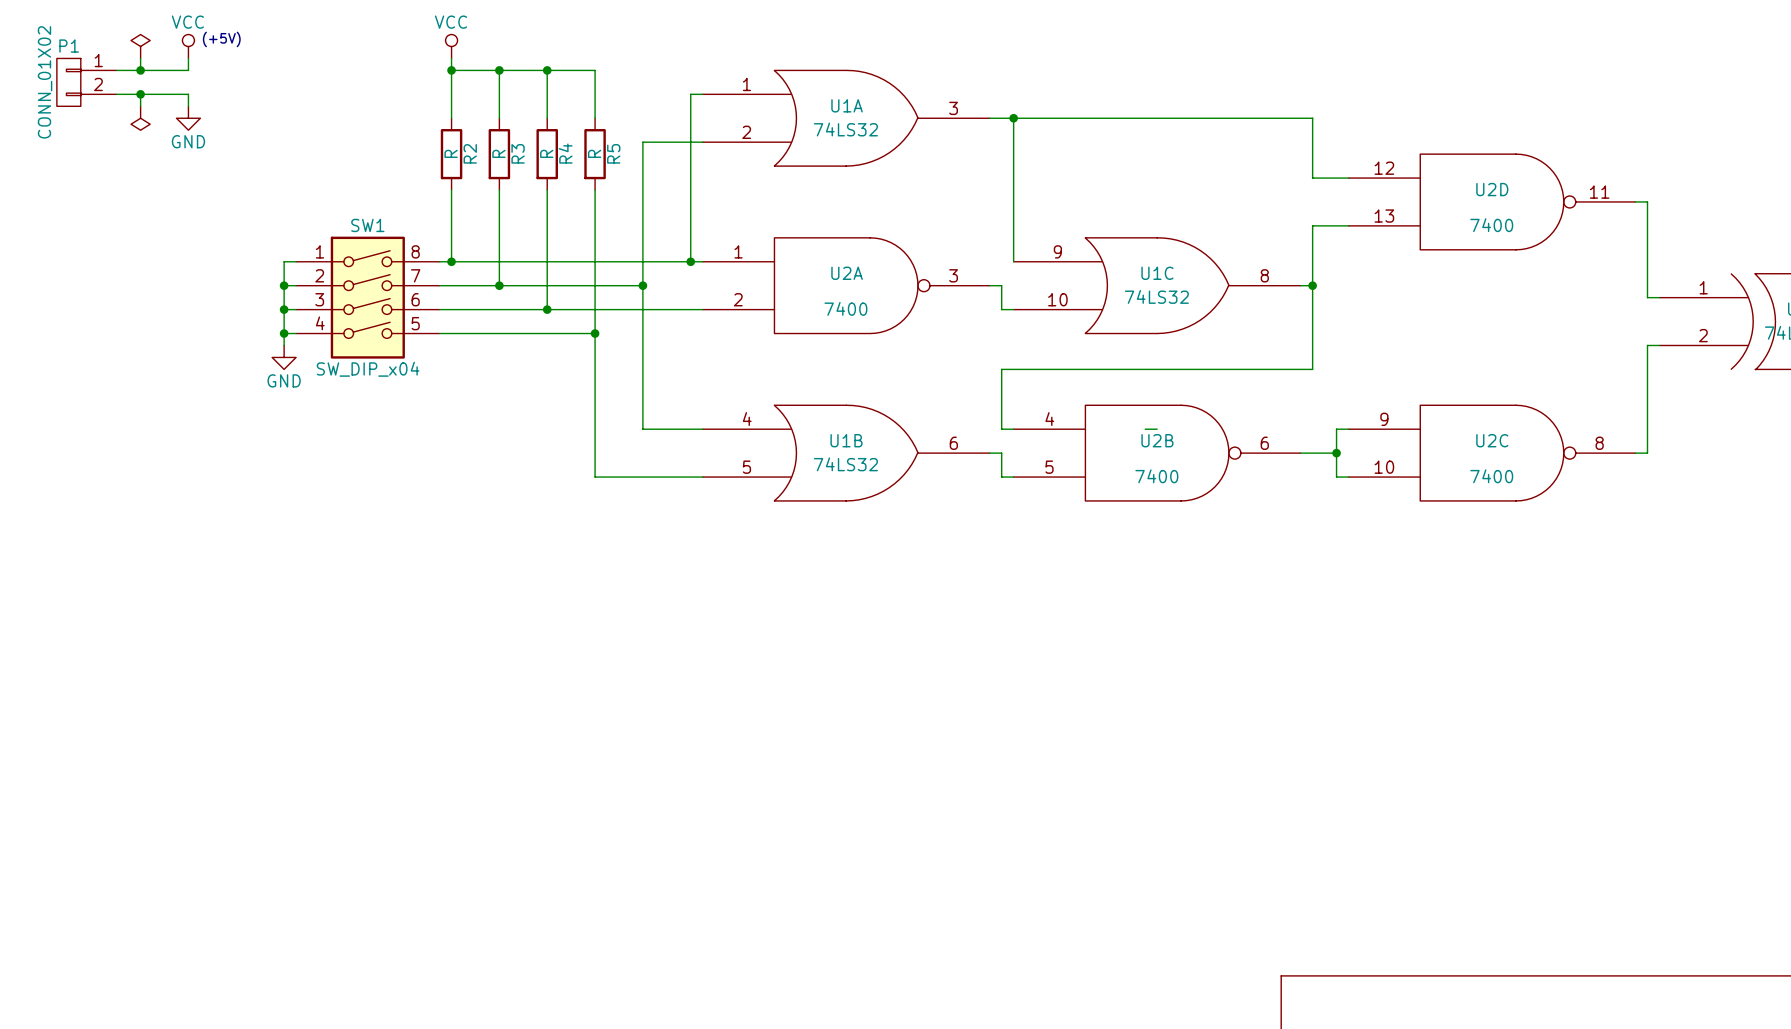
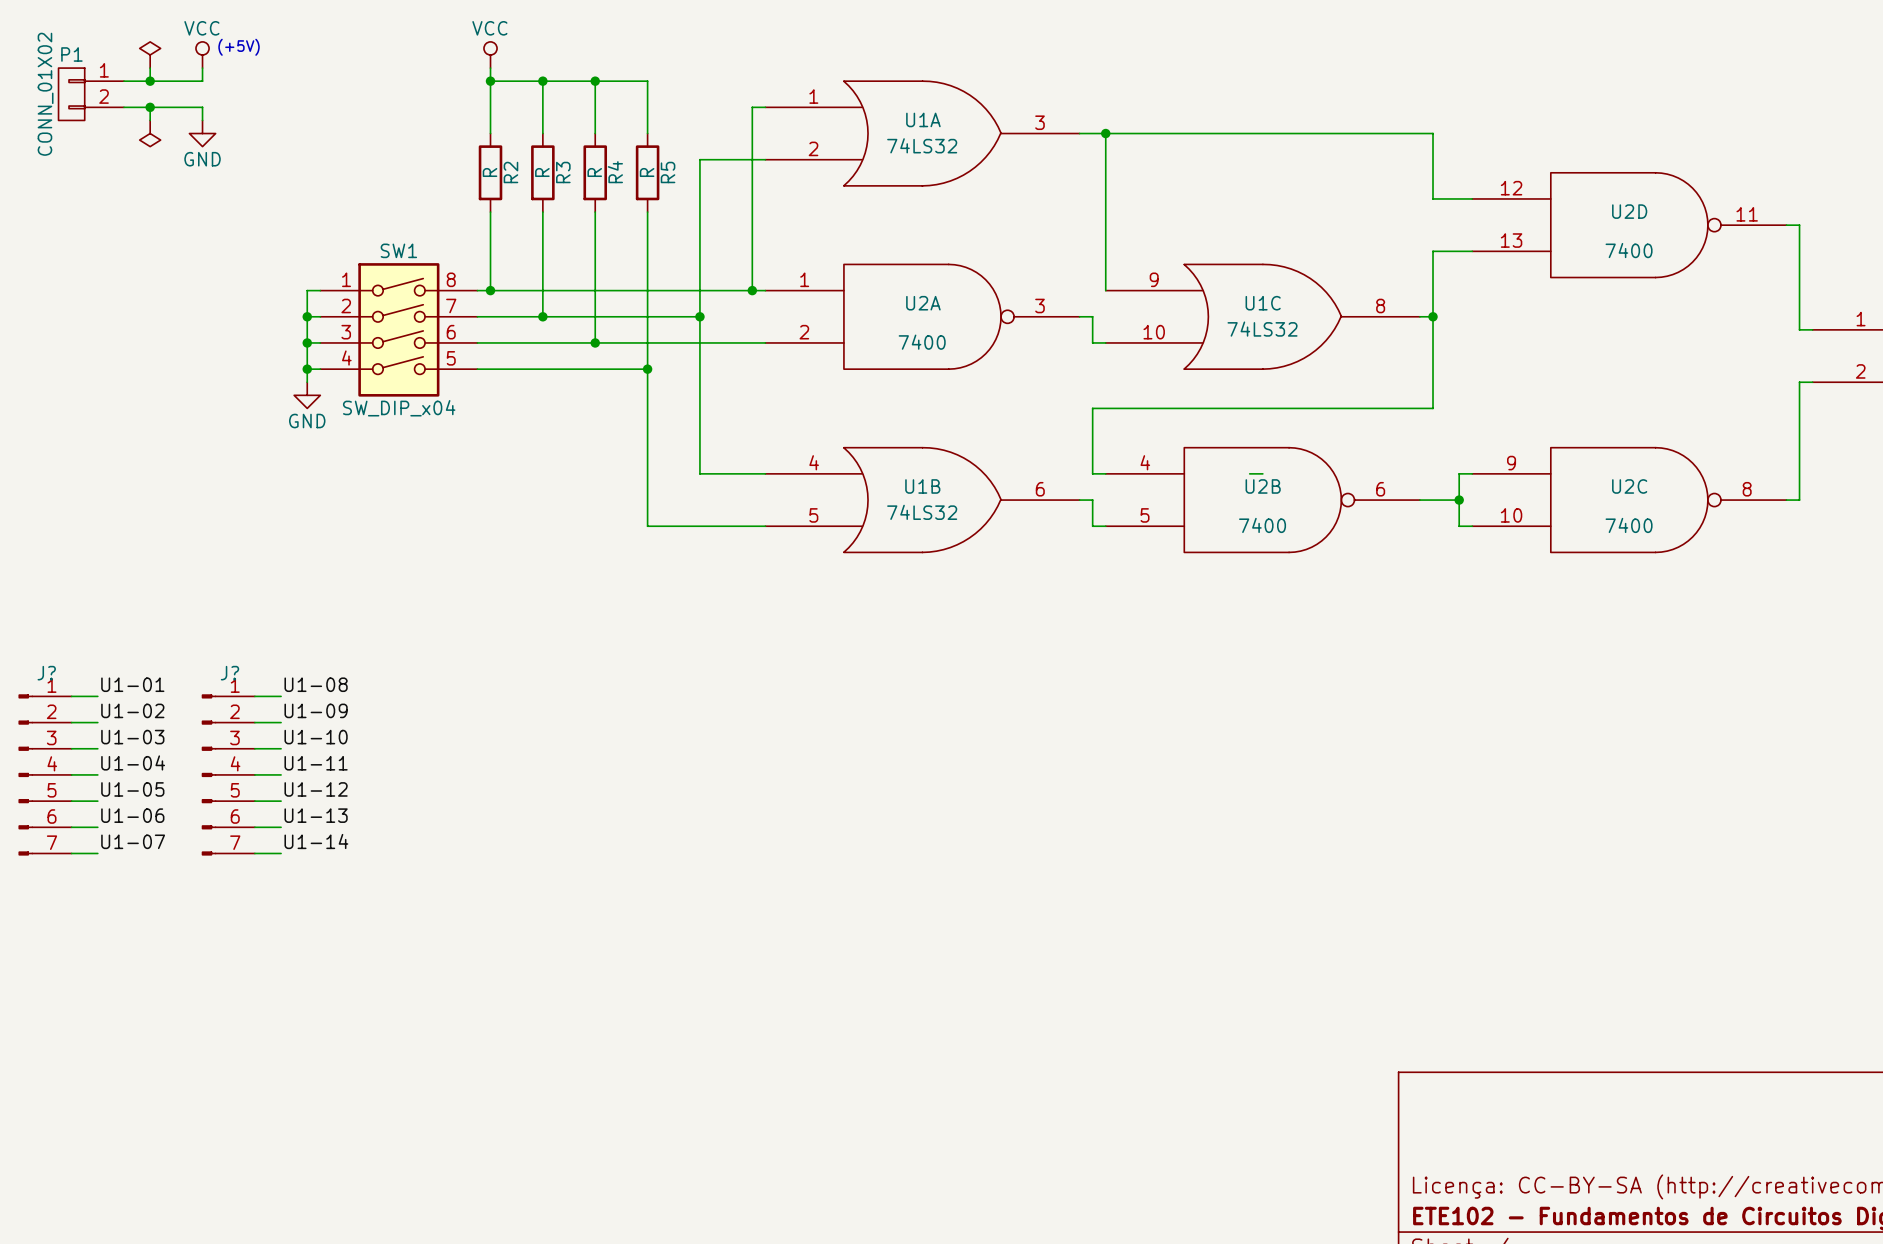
label: none -> U1-01 (132, 684)
label: none -> U1-08 (316, 684)
wire: none -> (71, 696) (97, 696)
wire: none -> (254, 696) (281, 696)
label: none -> U1-02 (132, 710)
label: none -> U1-09 (316, 710)
wire: none -> (71, 722) (97, 722)
wire: none -> (254, 722) (281, 722)
label: none -> U1-03 (132, 737)
label: none -> U1-10 (316, 737)
wire: none -> (71, 748) (97, 748)
wire: none -> (254, 748) (281, 748)
label: none -> U1-04 (133, 762)
label: none -> U1-11 (316, 763)
J?: none -> (45, 774)
wire: none -> (71, 774) (97, 774)
J?: none -> (228, 774)
wire: none -> (254, 774) (281, 774)
label: none -> U1-05 (132, 789)
label: none -> U1-12 (316, 789)
wire: none -> (71, 801) (97, 801)
wire: none -> (254, 801) (281, 801)
label: none -> U1-06 (132, 815)
label: none -> U1-13 (316, 815)
wire: none -> (71, 827) (97, 827)
wire: none -> (254, 827) (281, 827)
label: none -> U1-07 (133, 841)
label: none -> U1-14 (316, 841)
wire: none -> (71, 853) (97, 853)
wire: none -> (254, 853) (281, 853)

